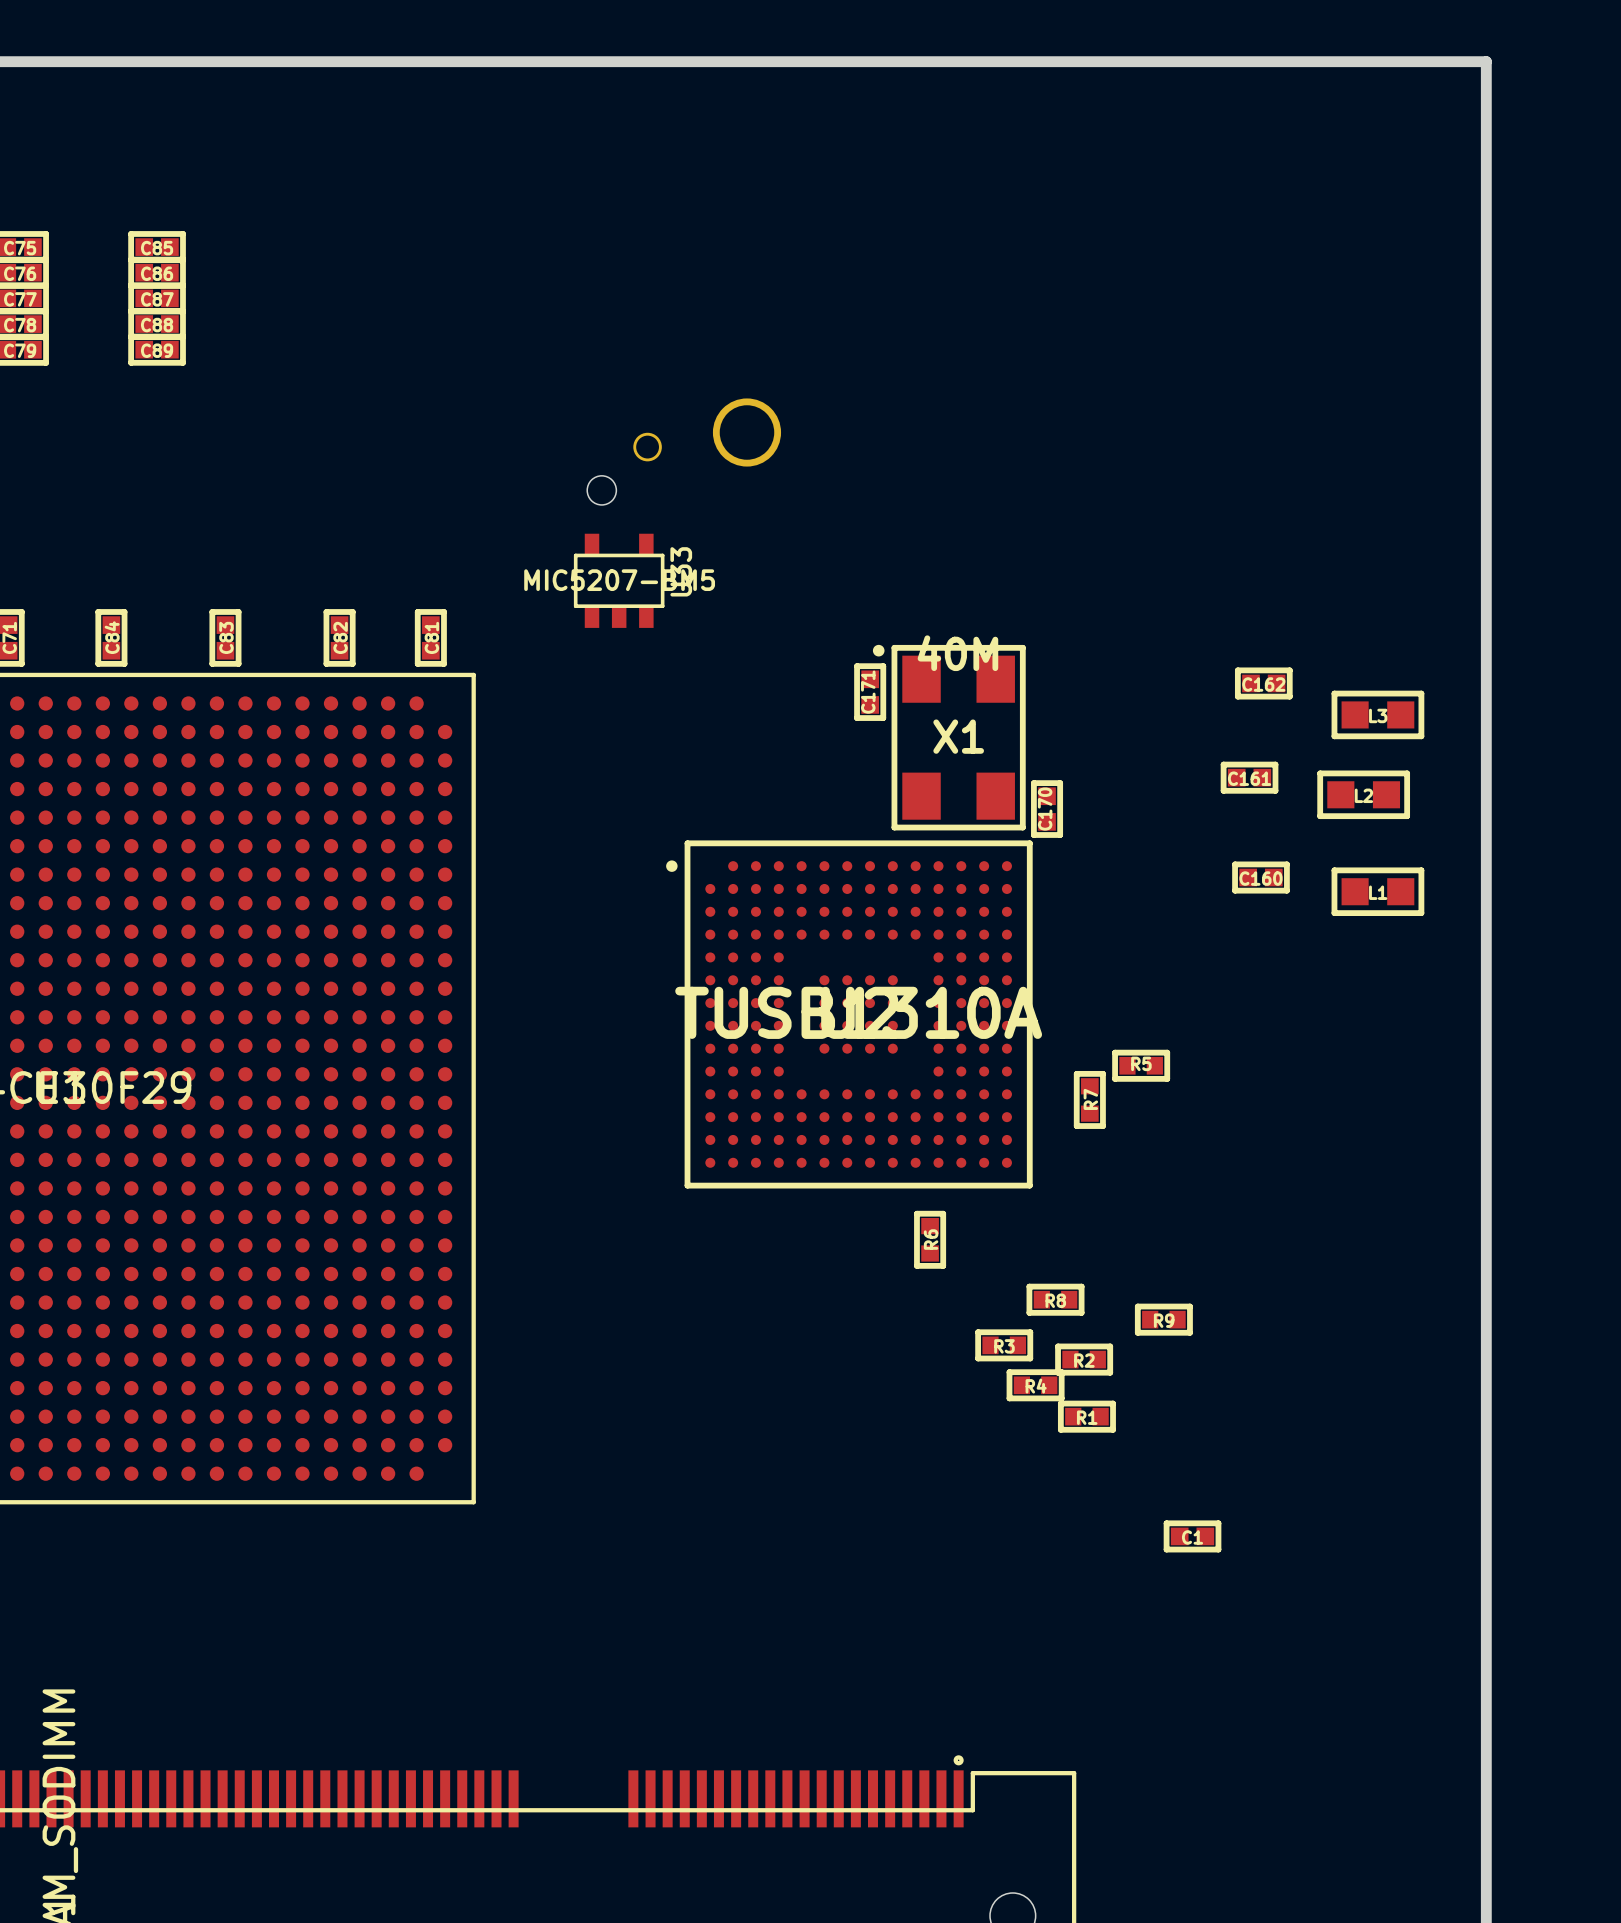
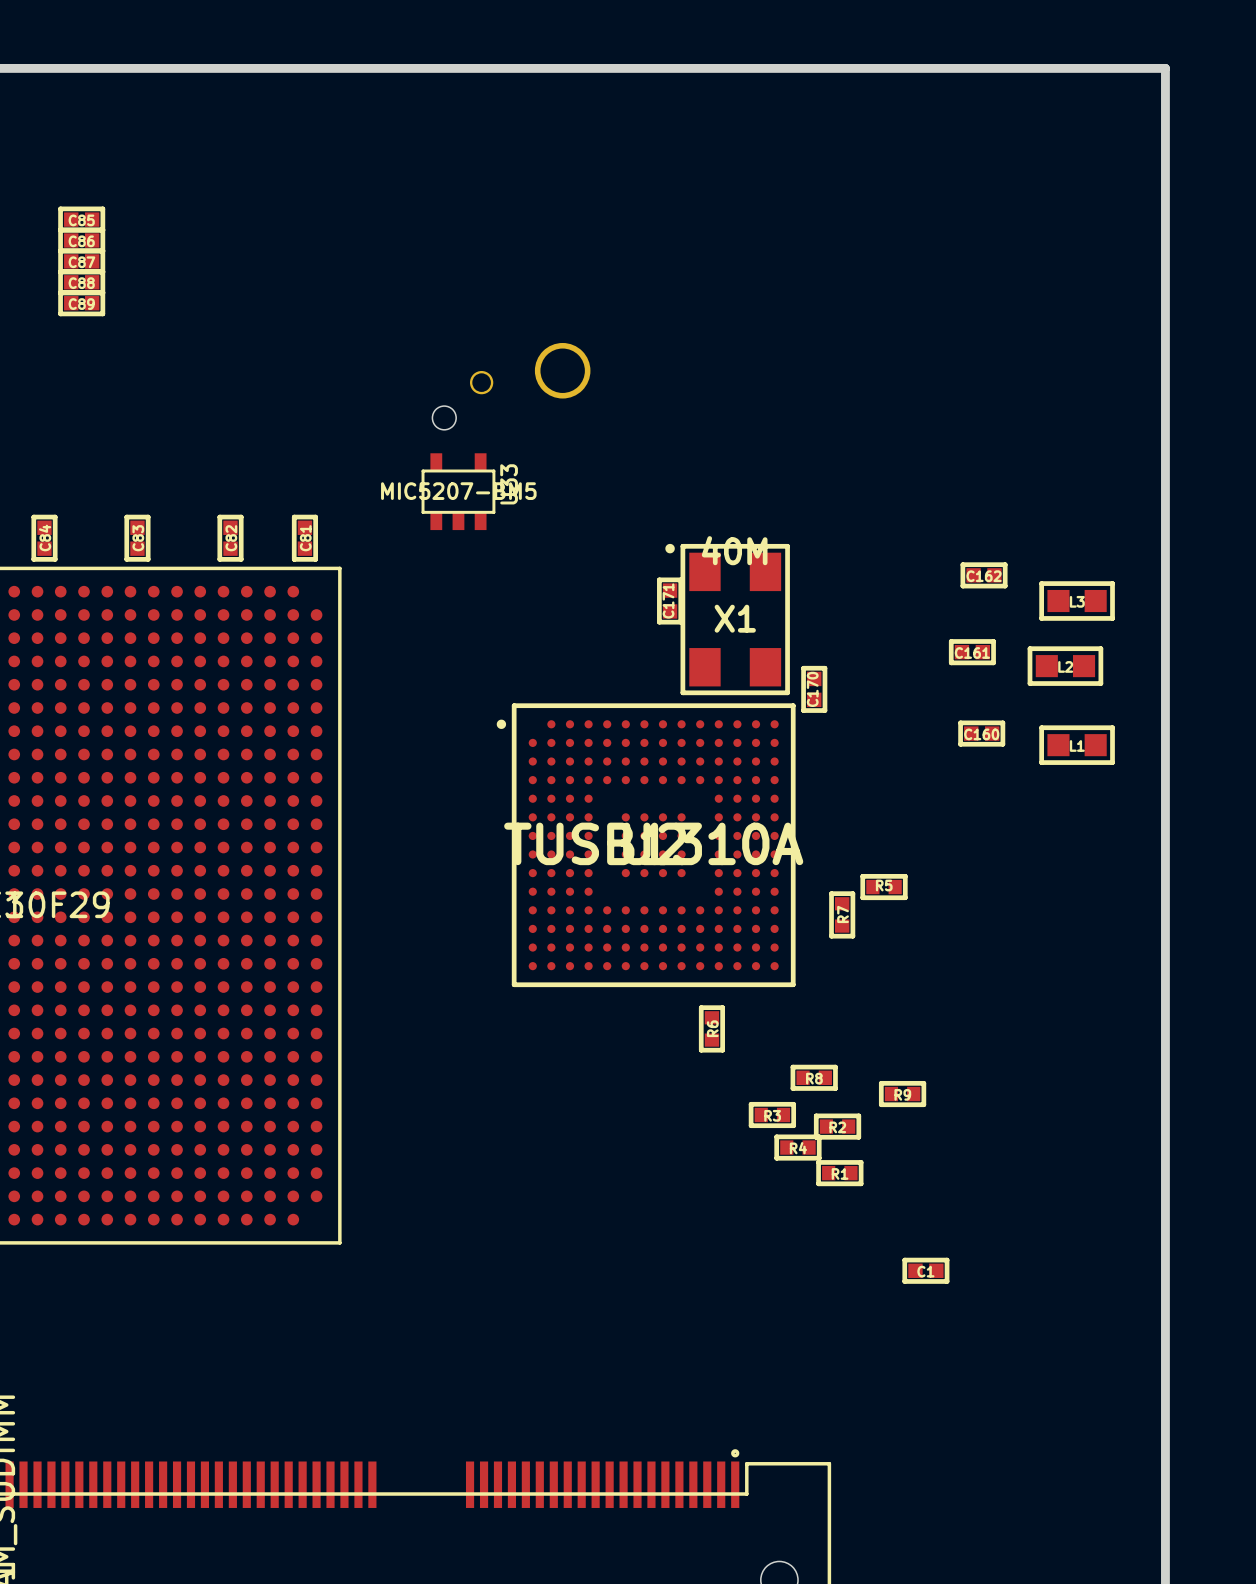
C171 position: (870, 692) -> (670, 601)
C170 position: (1047, 809) -> (814, 689)

